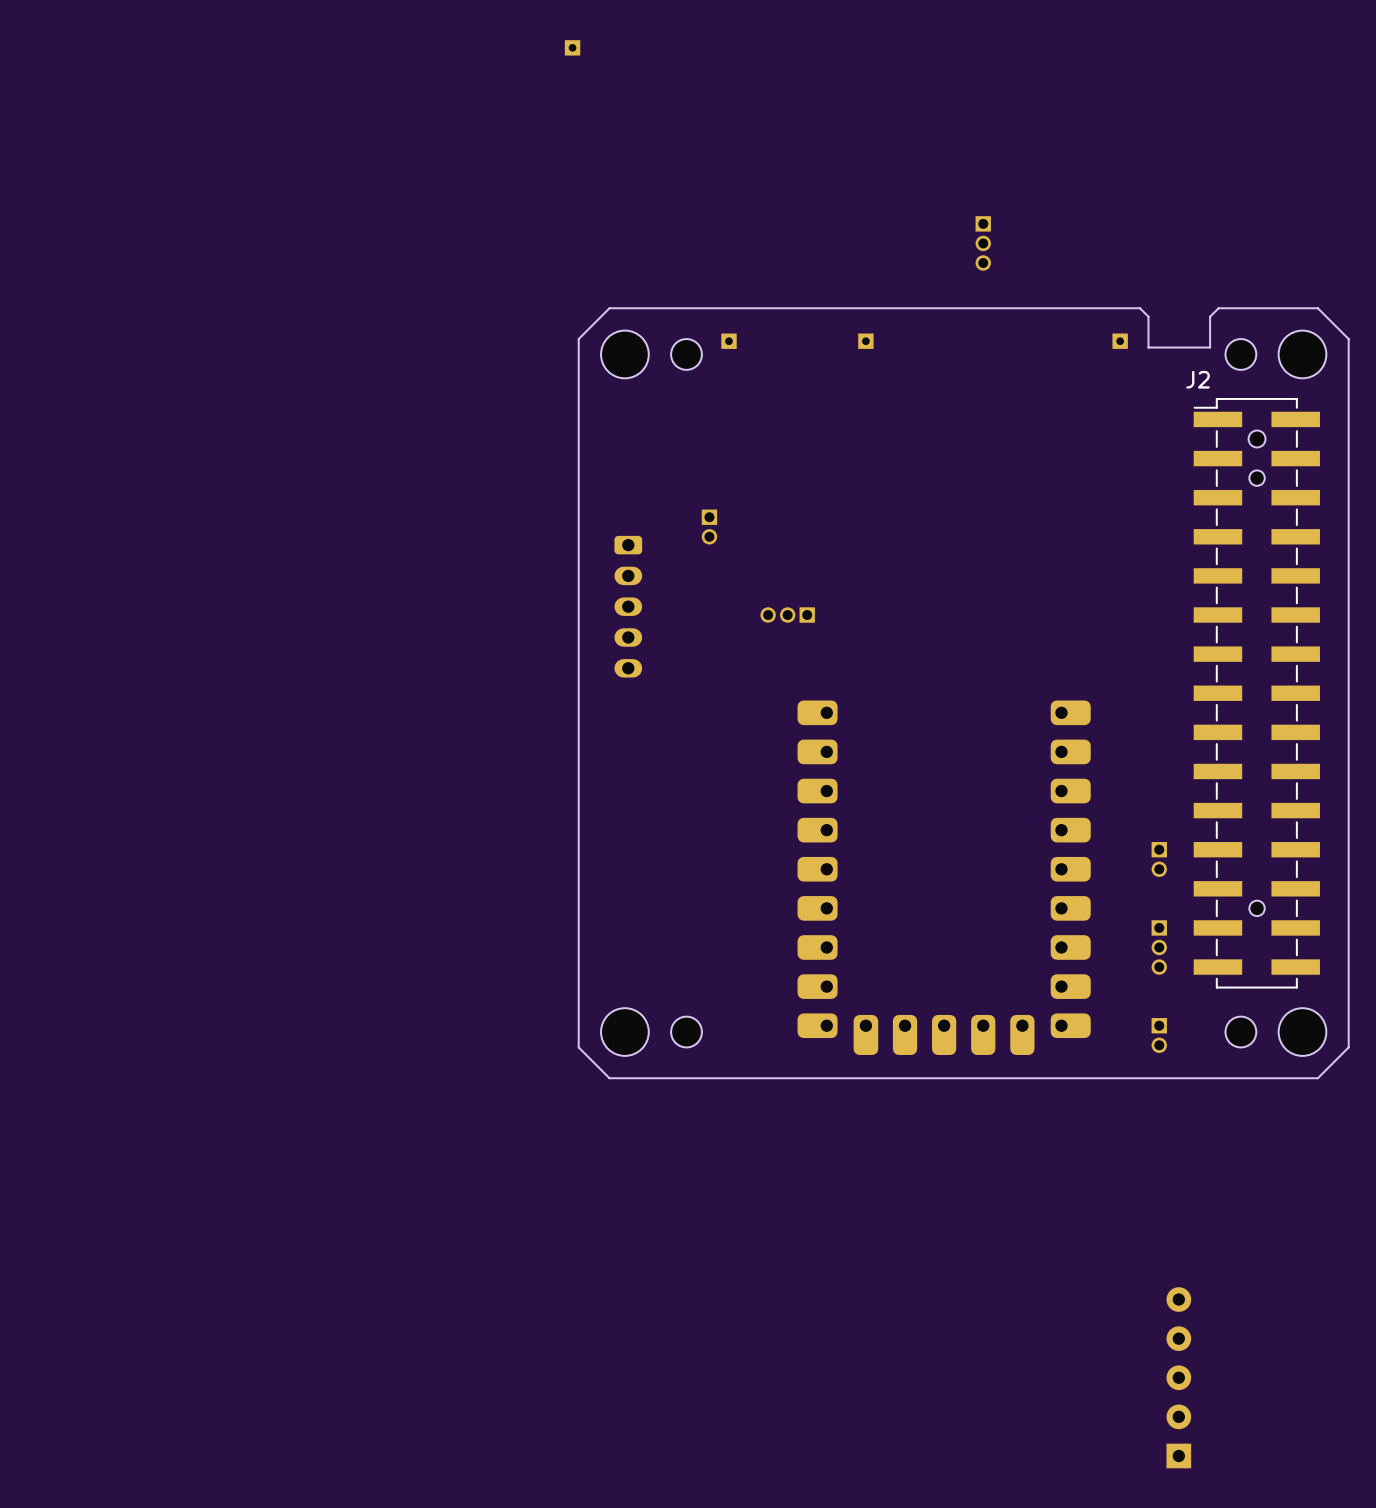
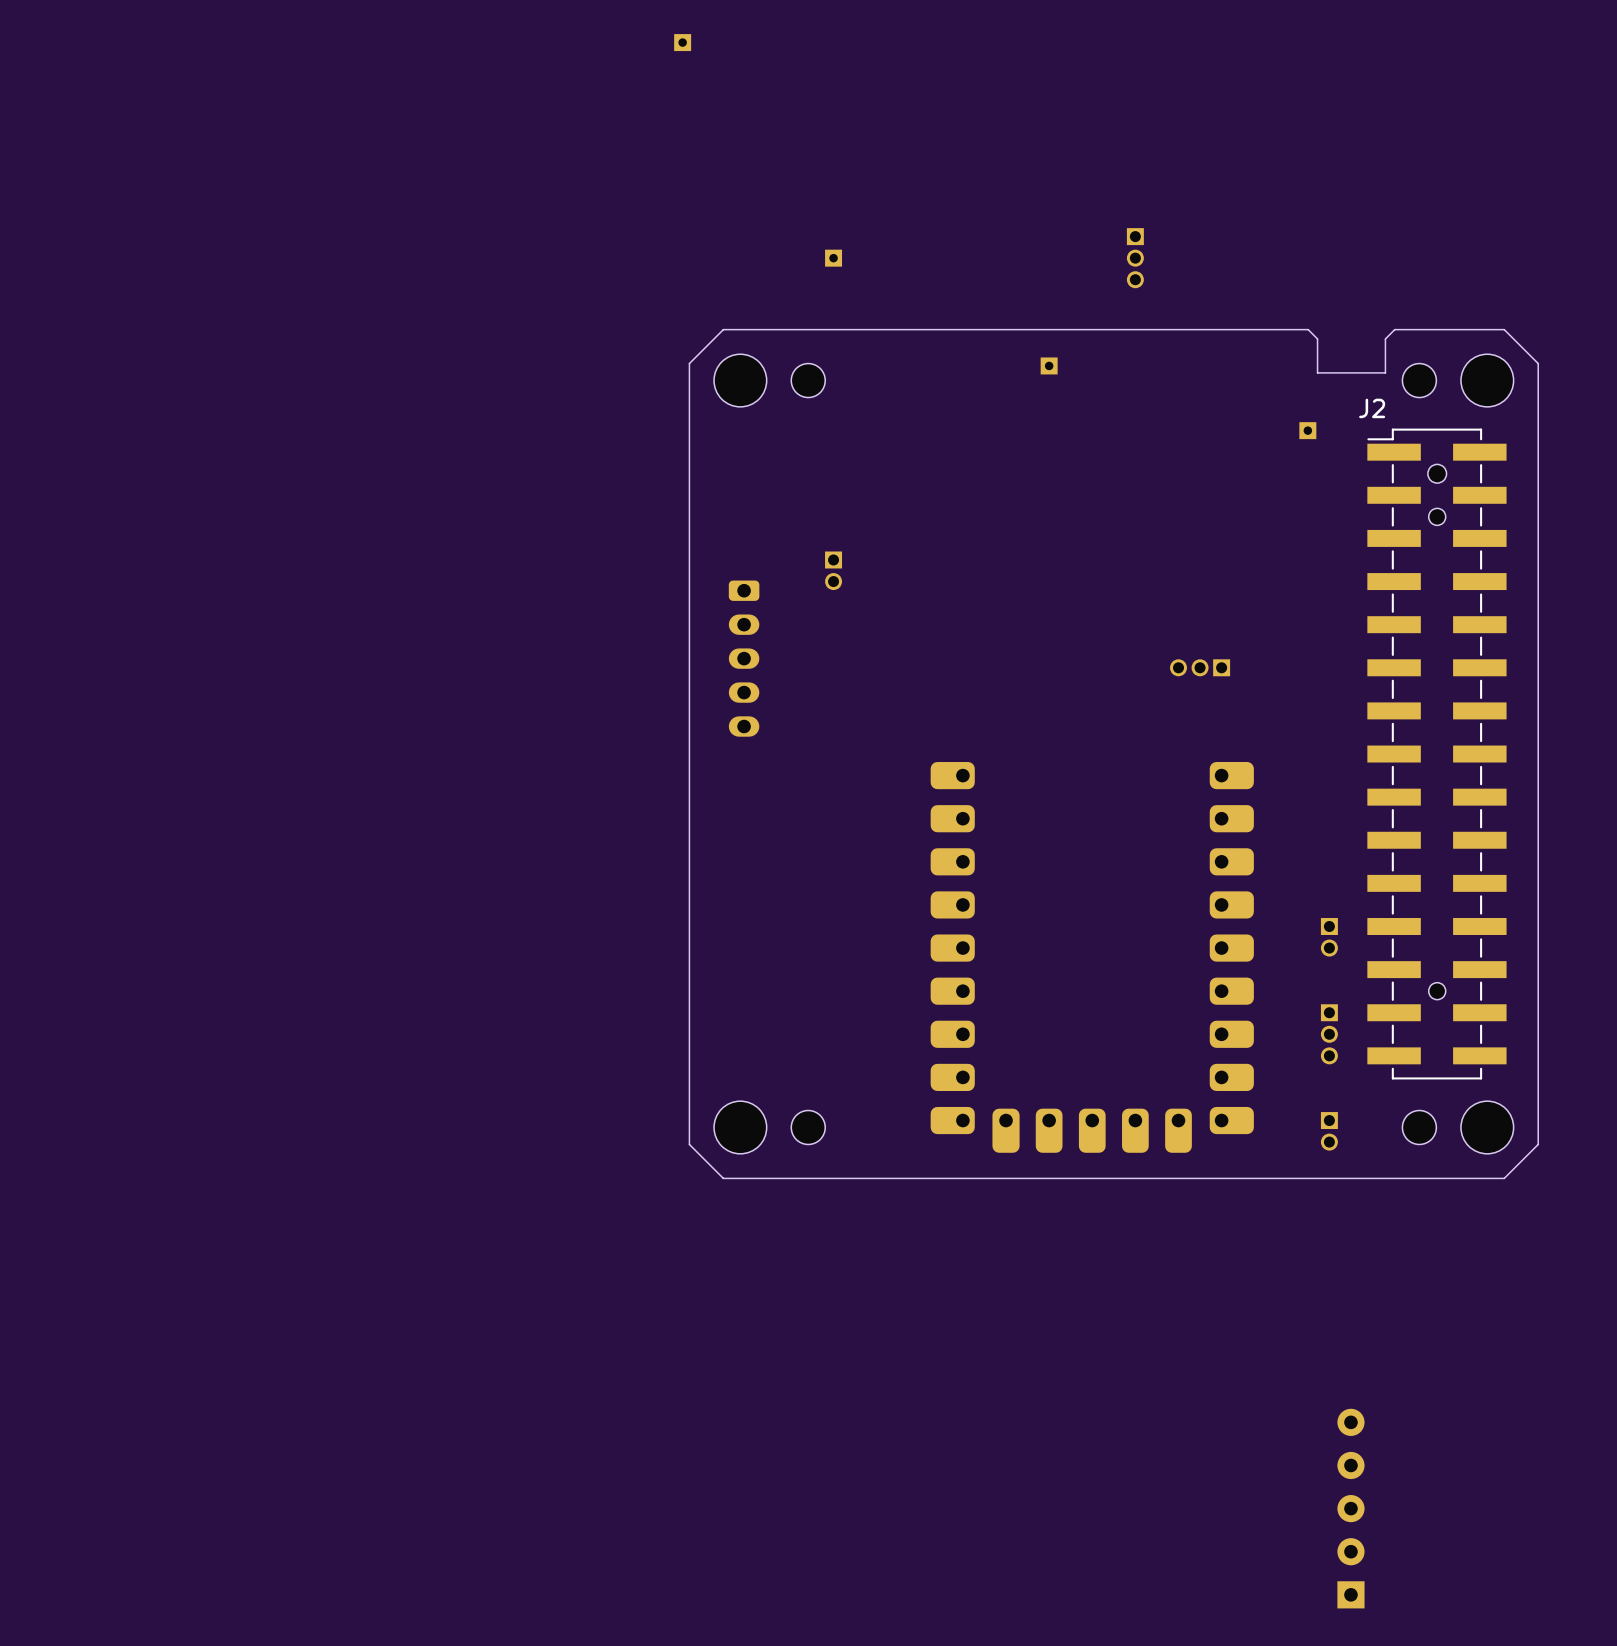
part: none -> (833, 258)
part: (729, 341) -> none
part position: (865, 341) -> (1049, 365)
part position: (1120, 341) -> (1307, 430)
part position: (787, 615) -> (1200, 667)

